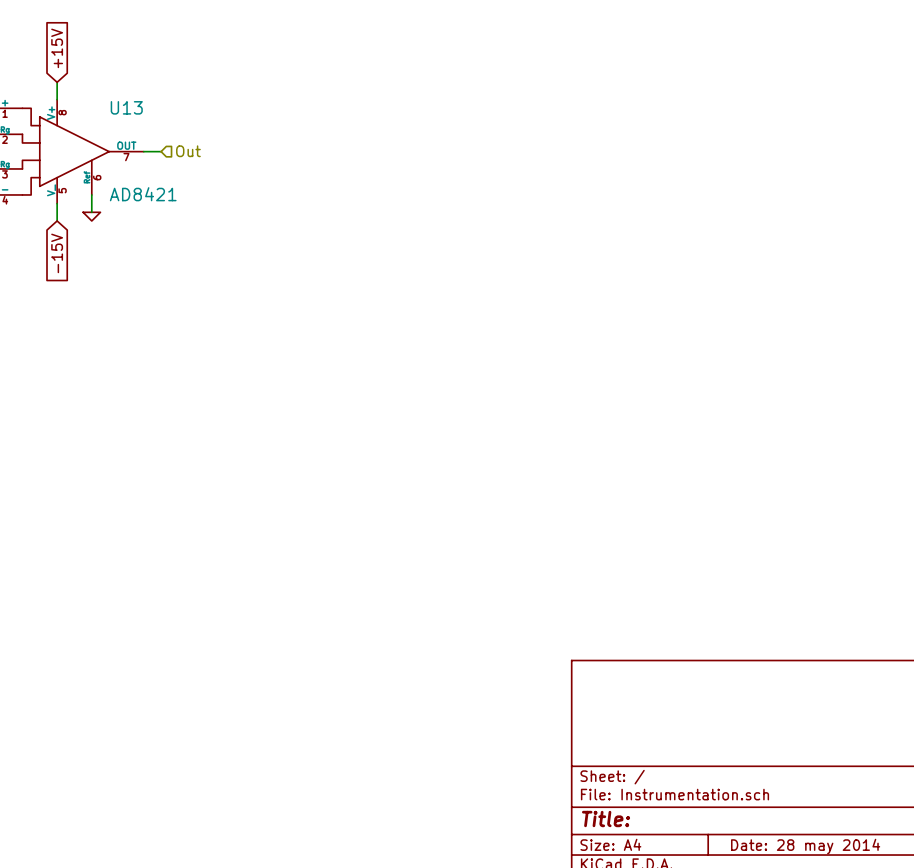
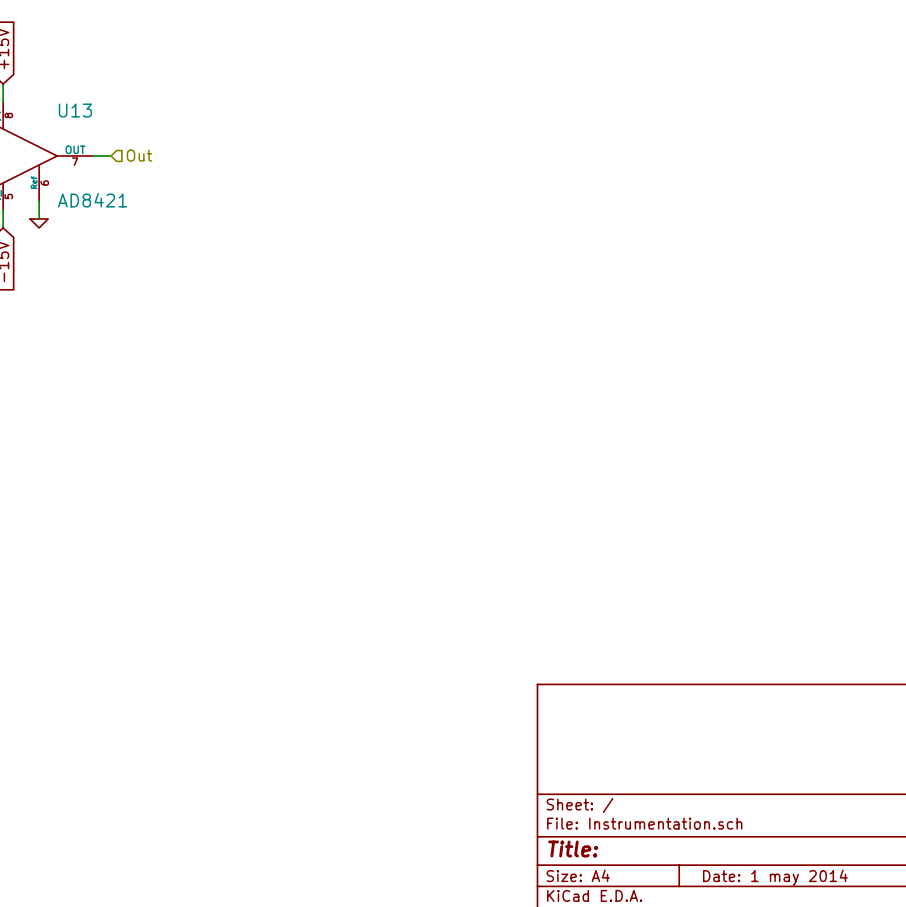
title block: Date: 28 may 2014 (805, 846) -> Date: 1 may 2014 (775, 877)

